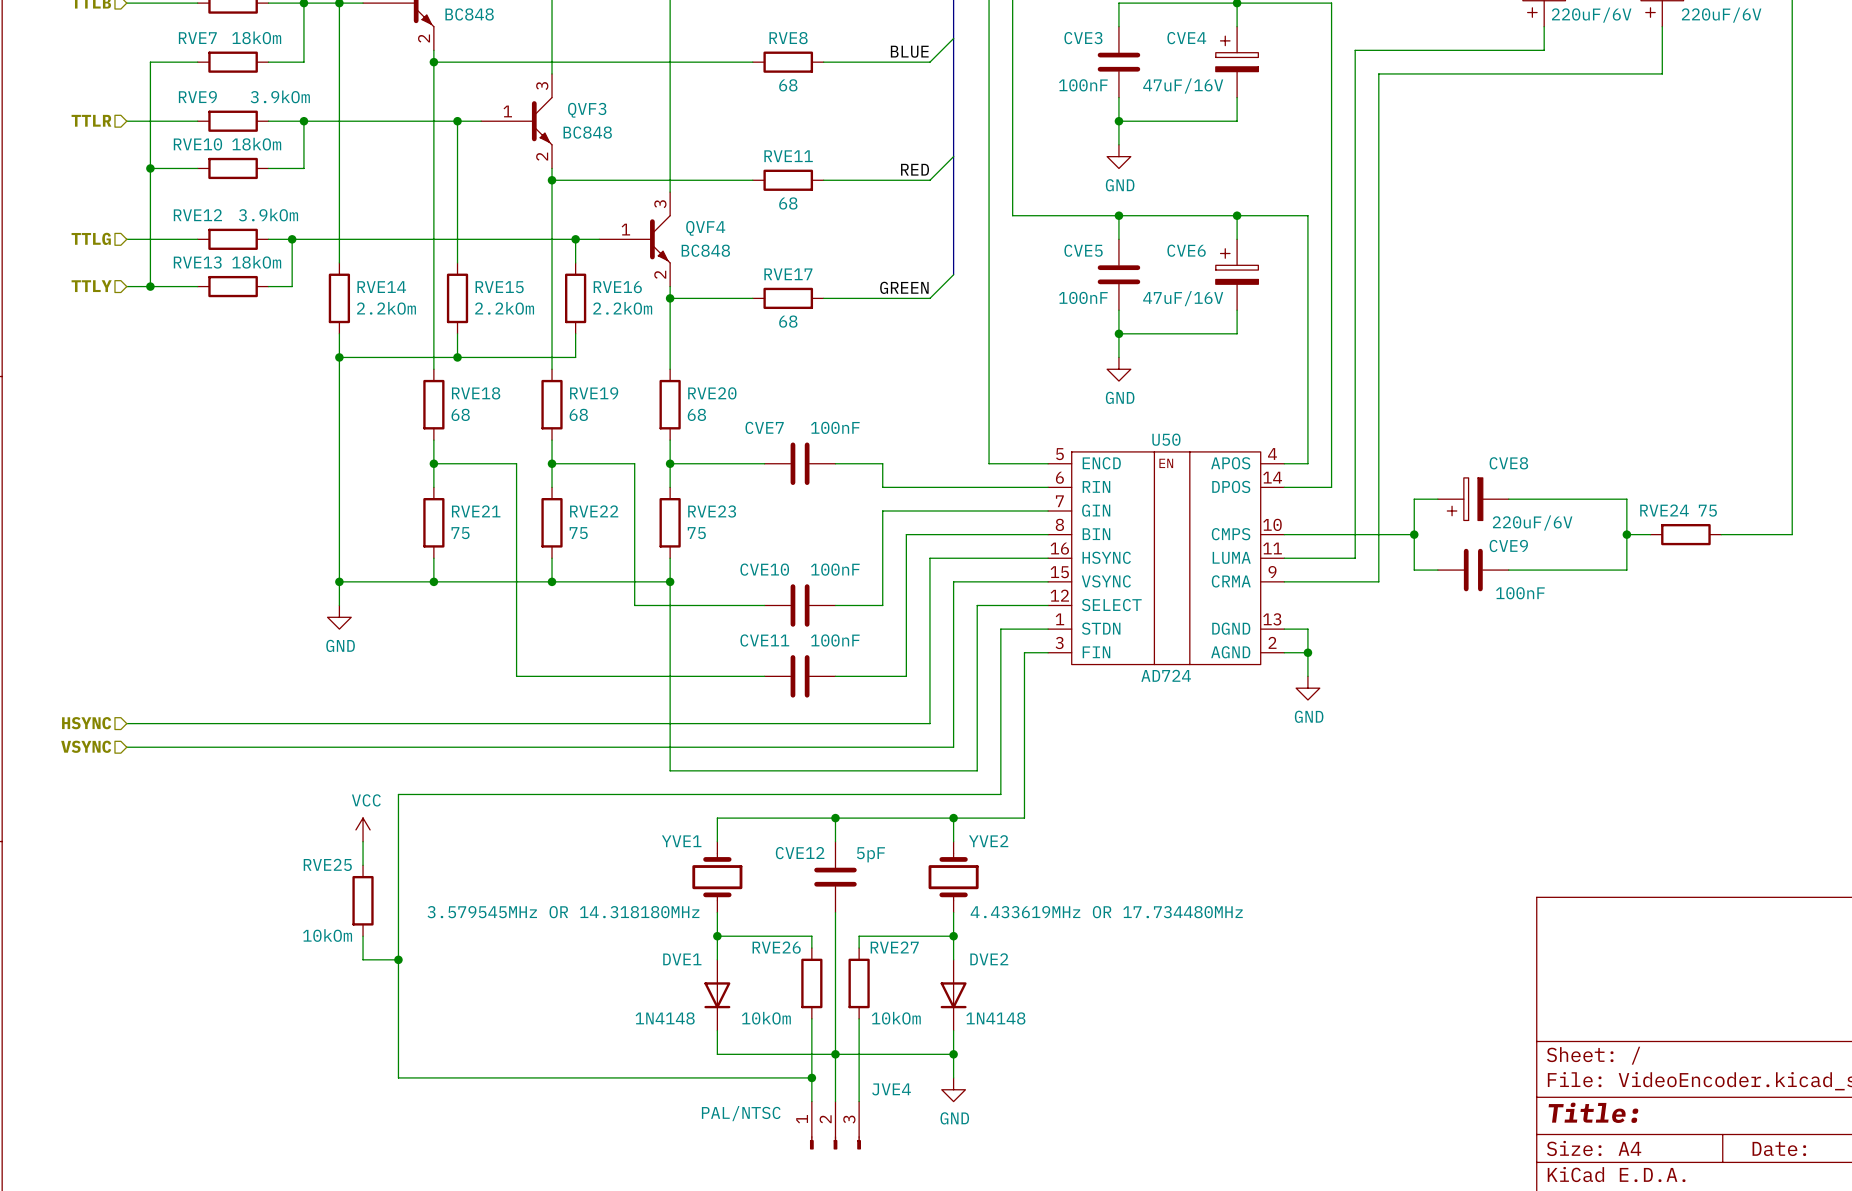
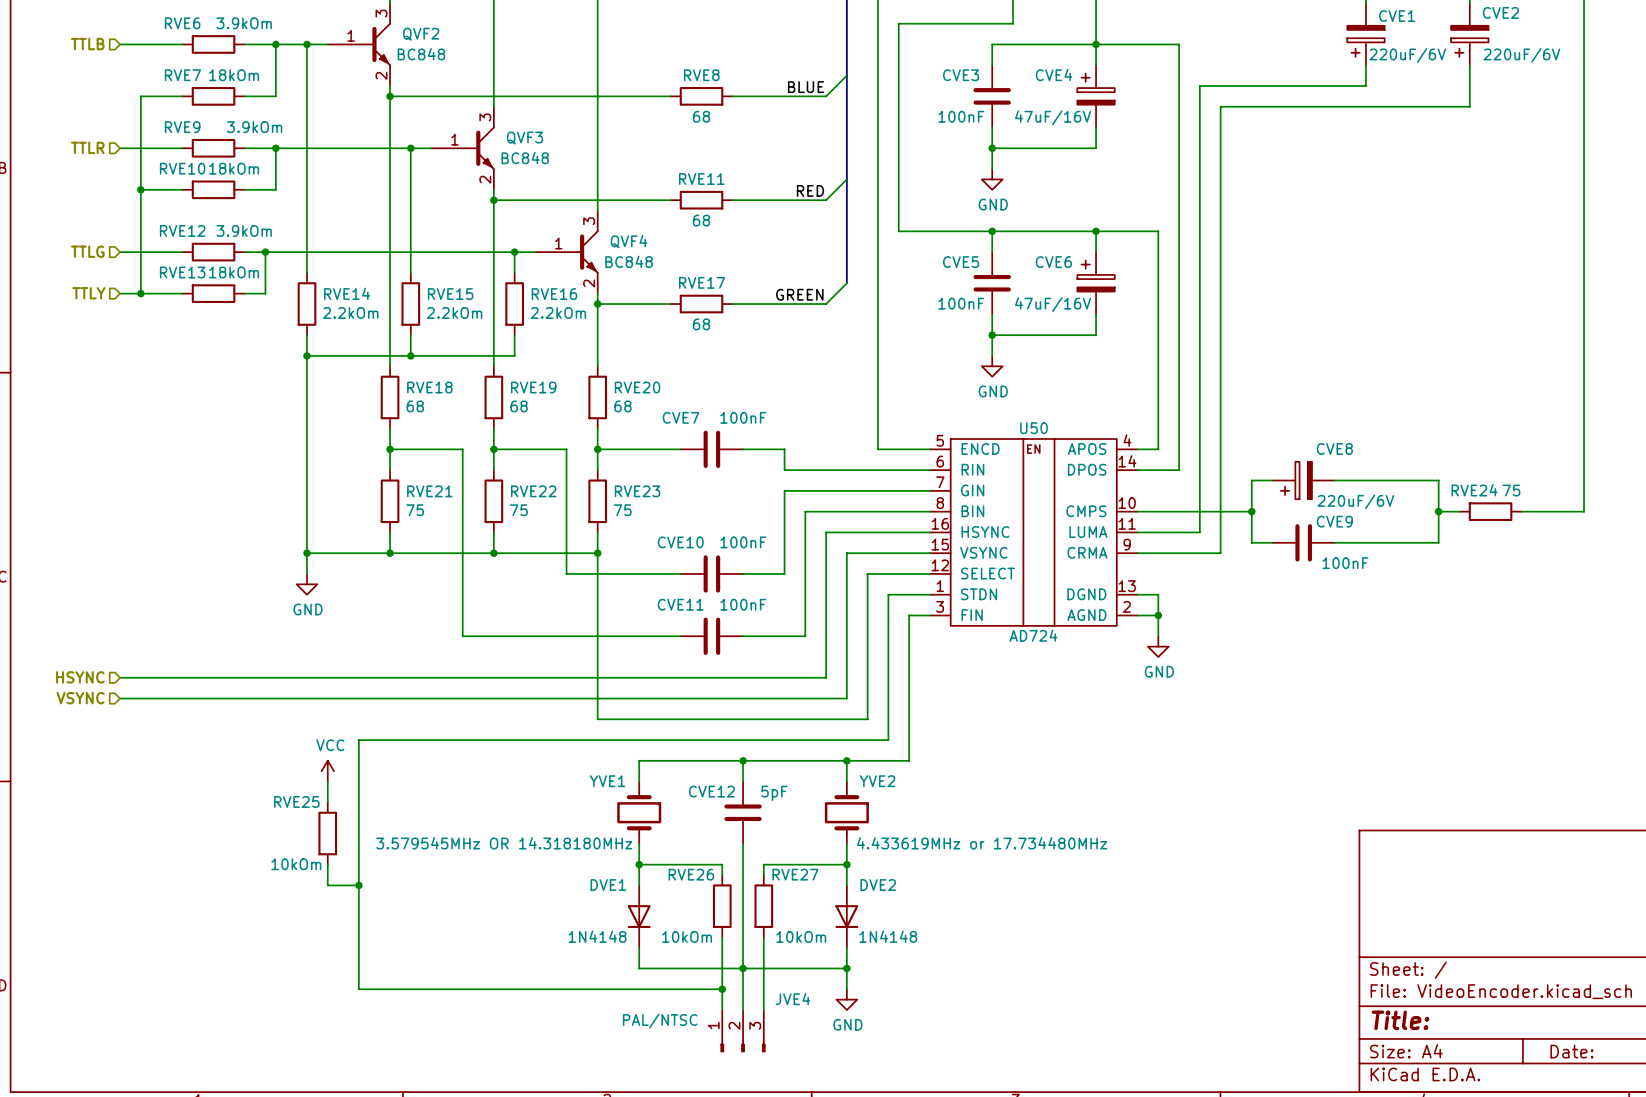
YVE2 value: 4.433619MHz OR 17.734480MHz (1106, 912) -> 4.433619MHz or 17.734480MHz (982, 843)

